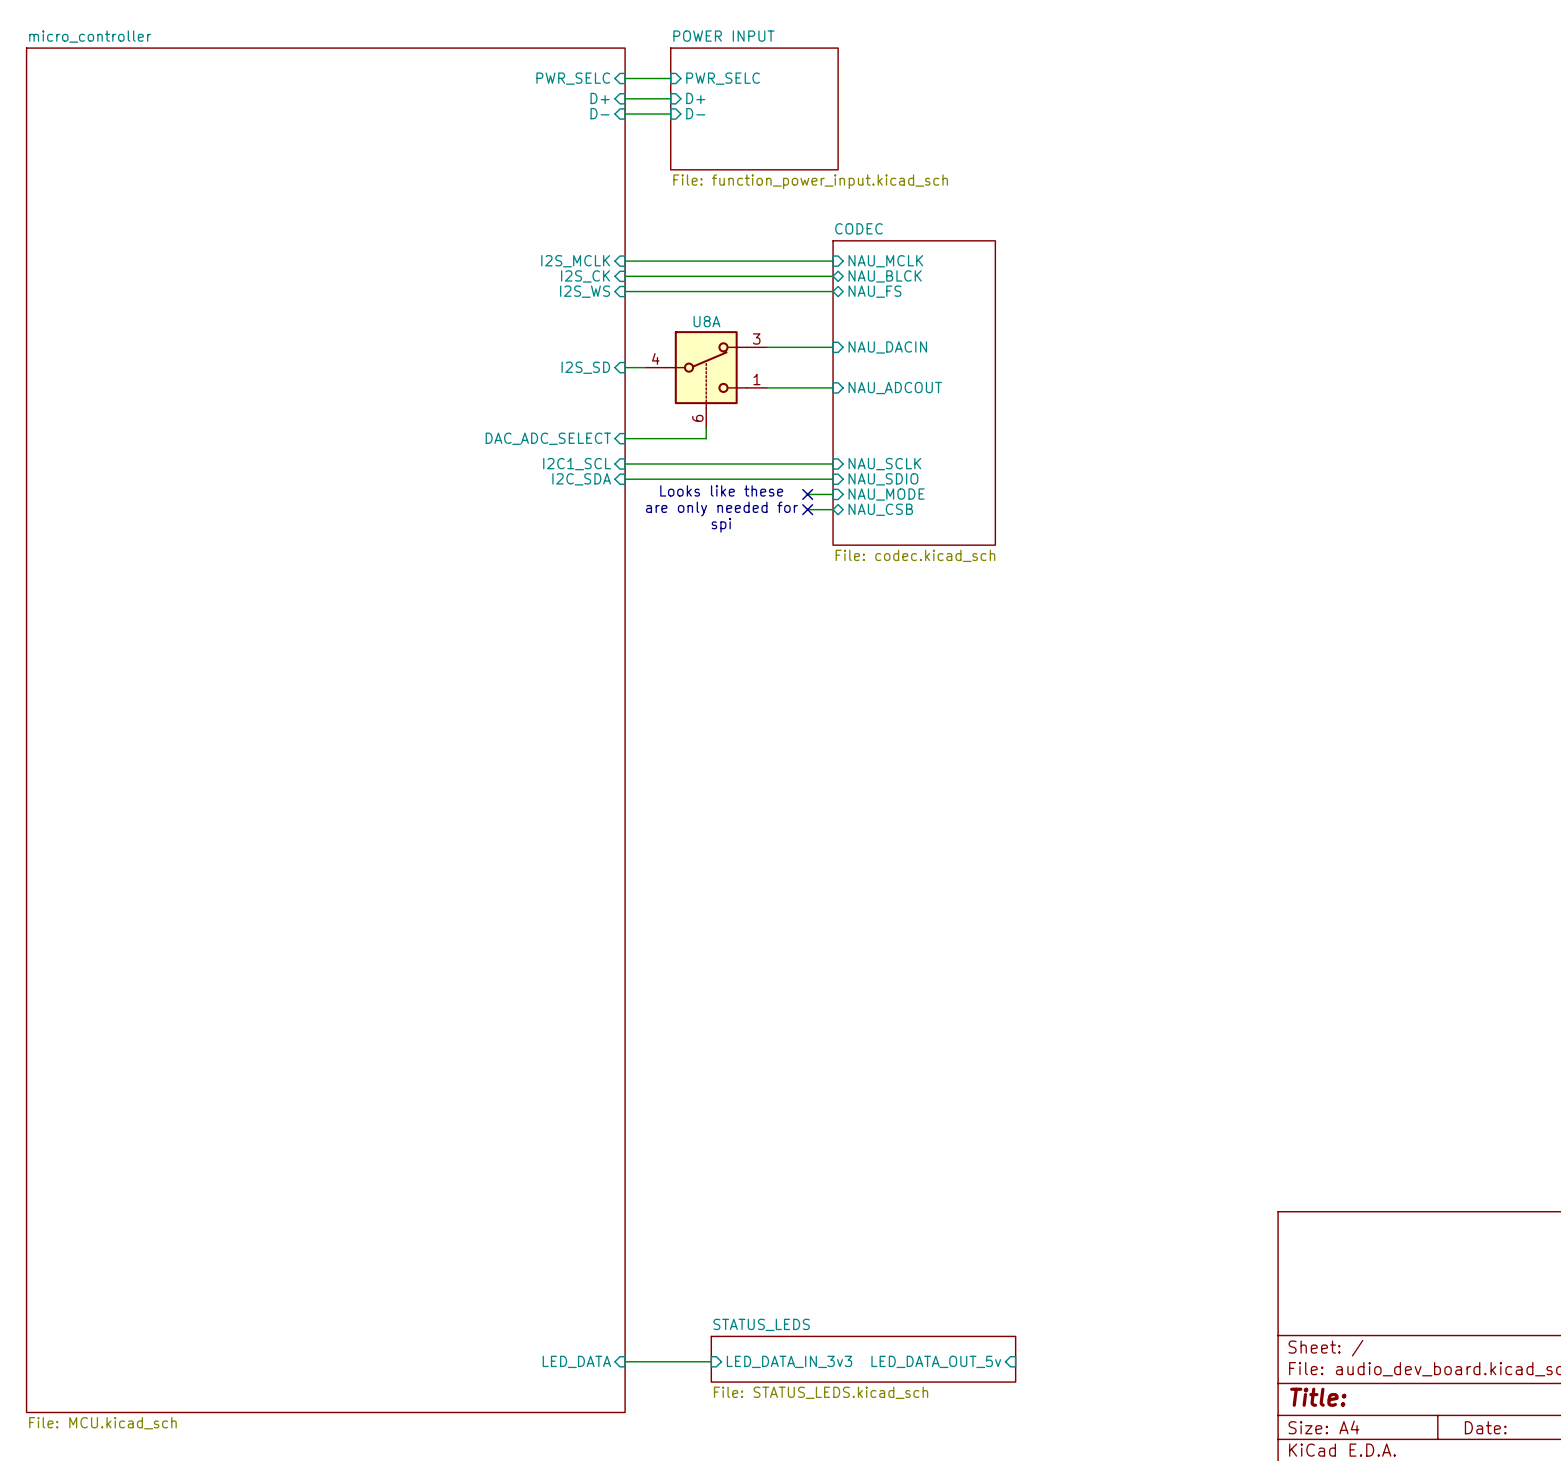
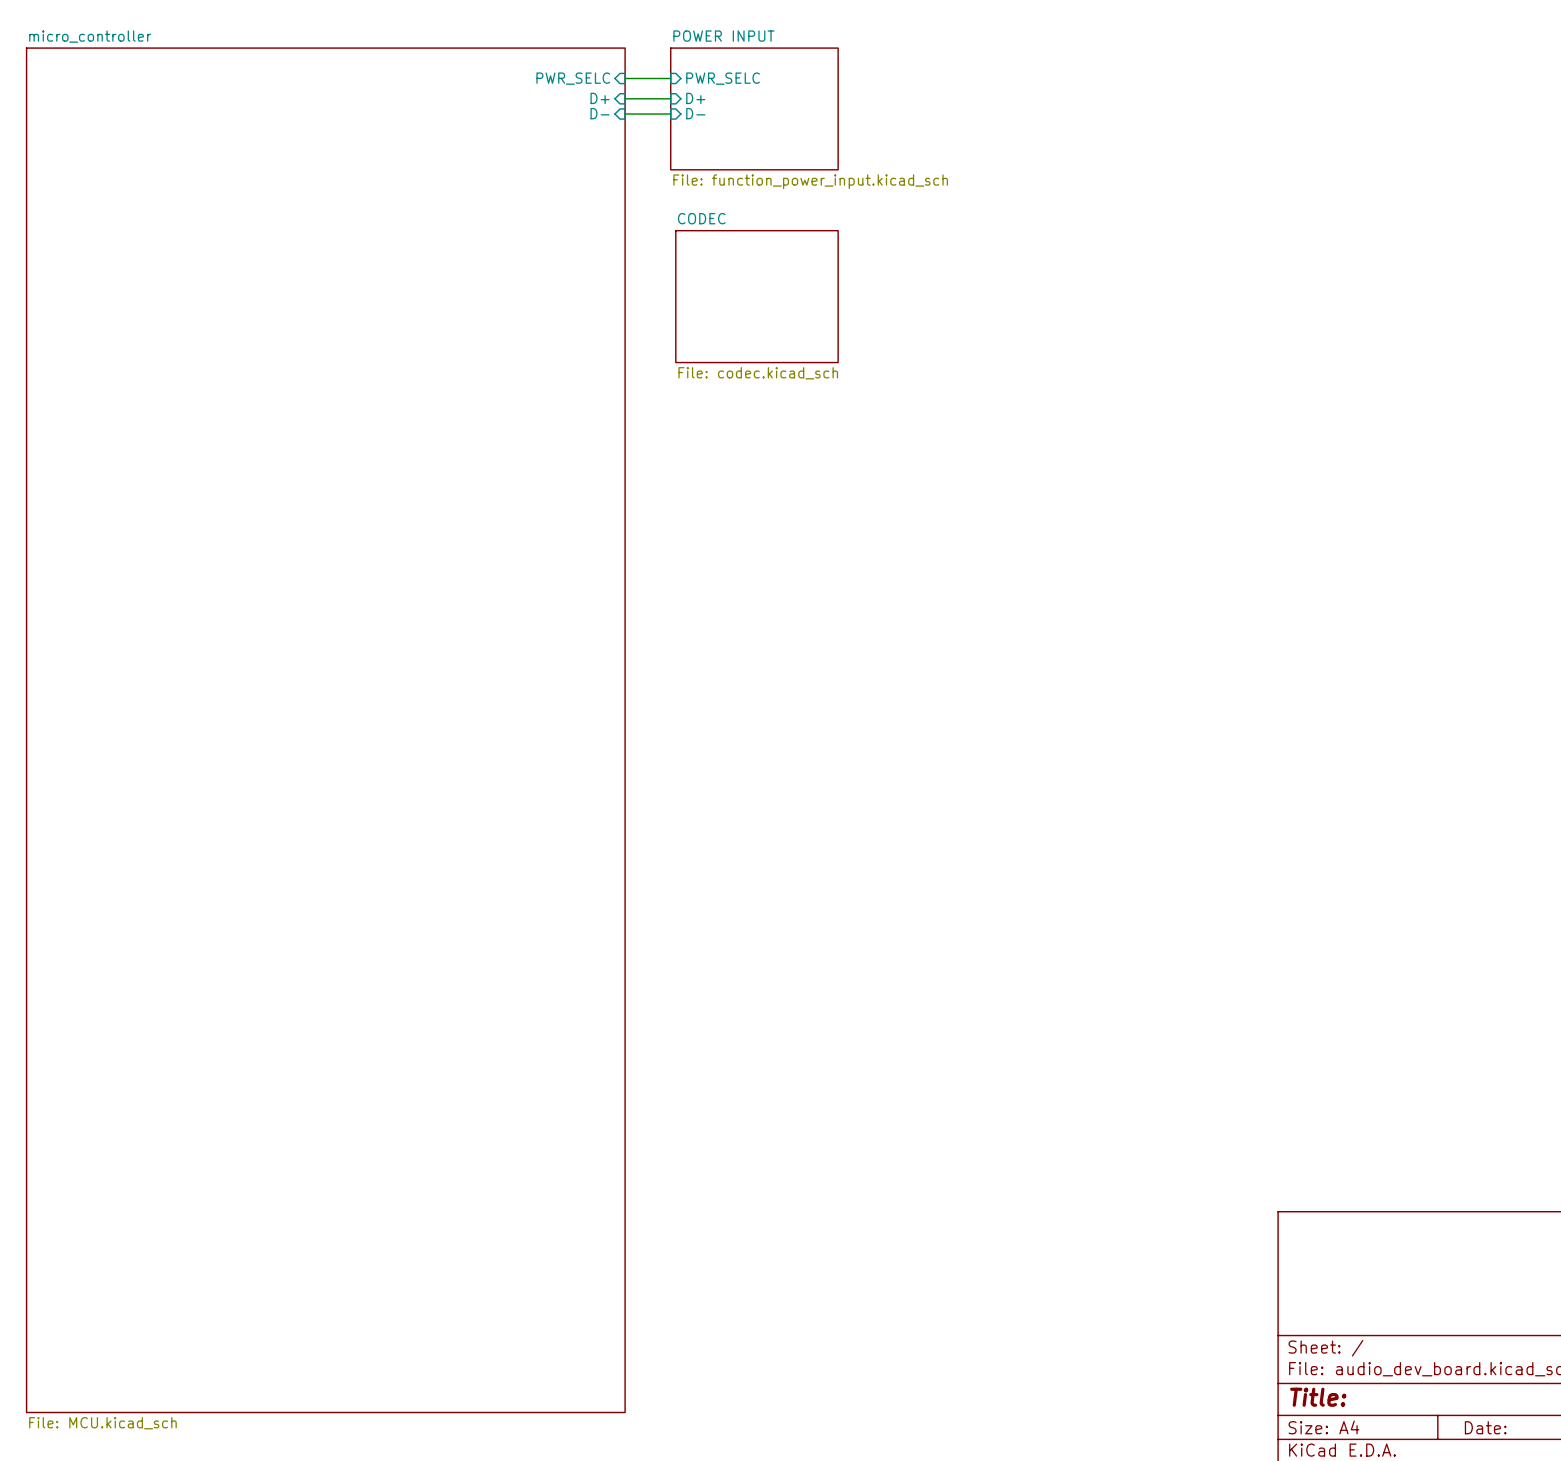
sheet pin: I2S_MCLK (575, 261) -> none
wire: (625, 261) (833, 261) -> none
sheet pin: NAU_MCLK (885, 261) -> none
sheet pin: I2S_CK (585, 276) -> none
wire: (625, 276) (833, 276) -> none
sheet pin: NAU_BLCK (885, 276) -> none
sheet pin: I2S_WS (585, 291) -> none
wire: (625, 291) (833, 291) -> none
sheet pin: NAU_FS (874, 291) -> none
sheet CODEC: none -> File: codec.kicad_sch (756, 296)
wire: (767, 347) (833, 347) -> none
sheet pin: NAU_DACIN (887, 347) -> none
sheet pin: I2S_SD (585, 367) -> none
wire: (625, 367) (645, 367) -> none
U8A: (706, 379) -> none
wire: (767, 387) (833, 387) -> none
sheet pin: NAU_ADCOUT (895, 388) -> none
sheet CODEC: File: codec.kicad_sch (914, 392) -> none
wire: (706, 428) (706, 438) (625, 438) -> none
sheet pin: DAC_ADC_SELECT (548, 438) -> none
sheet pin: I2C1_SCL (577, 464) -> none
wire: (625, 464) (833, 464) -> none
sheet pin: NAU_SCLK (884, 464) -> none
sheet pin: I2C_SDA (581, 479) -> none
wire: (625, 479) (833, 479) -> none
sheet pin: NAU_SDIO (883, 479) -> none
text: Looks like these (721, 490) -> none
wire: (807, 494) (833, 494) -> none
no-connect mark: (807, 494) -> none
sheet pin: NAU_MODE (886, 494) -> none
text: are only needed for (721, 508) -> none
wire: (807, 509) (833, 509) -> none
no-connect mark: (807, 509) -> none
sheet pin: NAU_CSB (880, 509) -> none
text: spi (721, 525) -> none
sheet STATUS_LEDS: File: STATUS_LEDS.kicad_sch (863, 1359) -> none
sheet pin: LED_DATA (576, 1361) -> none
wire: (625, 1361) (711, 1361) -> none
sheet pin: LED_DATA_IN_3v3 (789, 1361) -> none
sheet pin: LED_DATA_OUT_5v (936, 1361) -> none

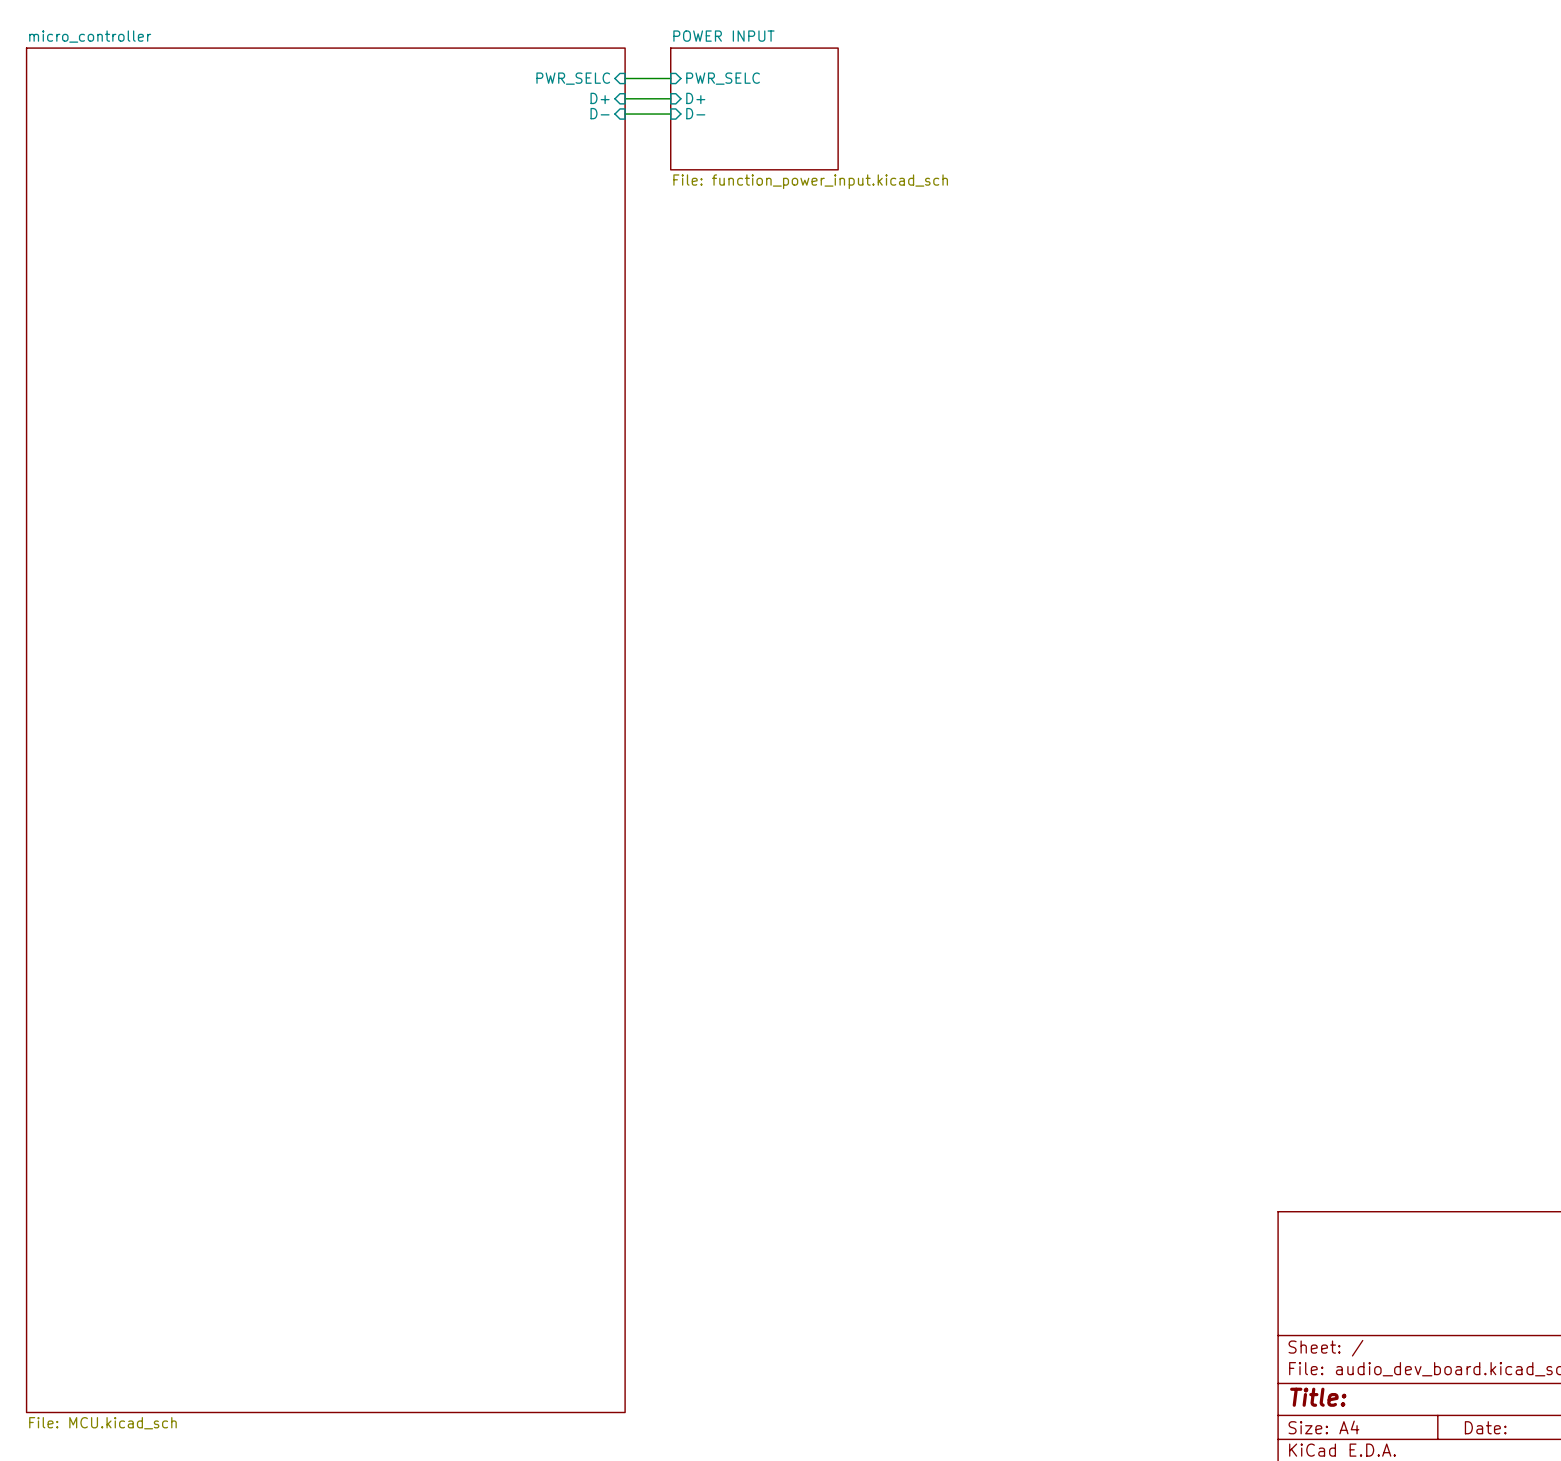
sheet CODEC: File: codec.kicad_sch (756, 296) -> none

